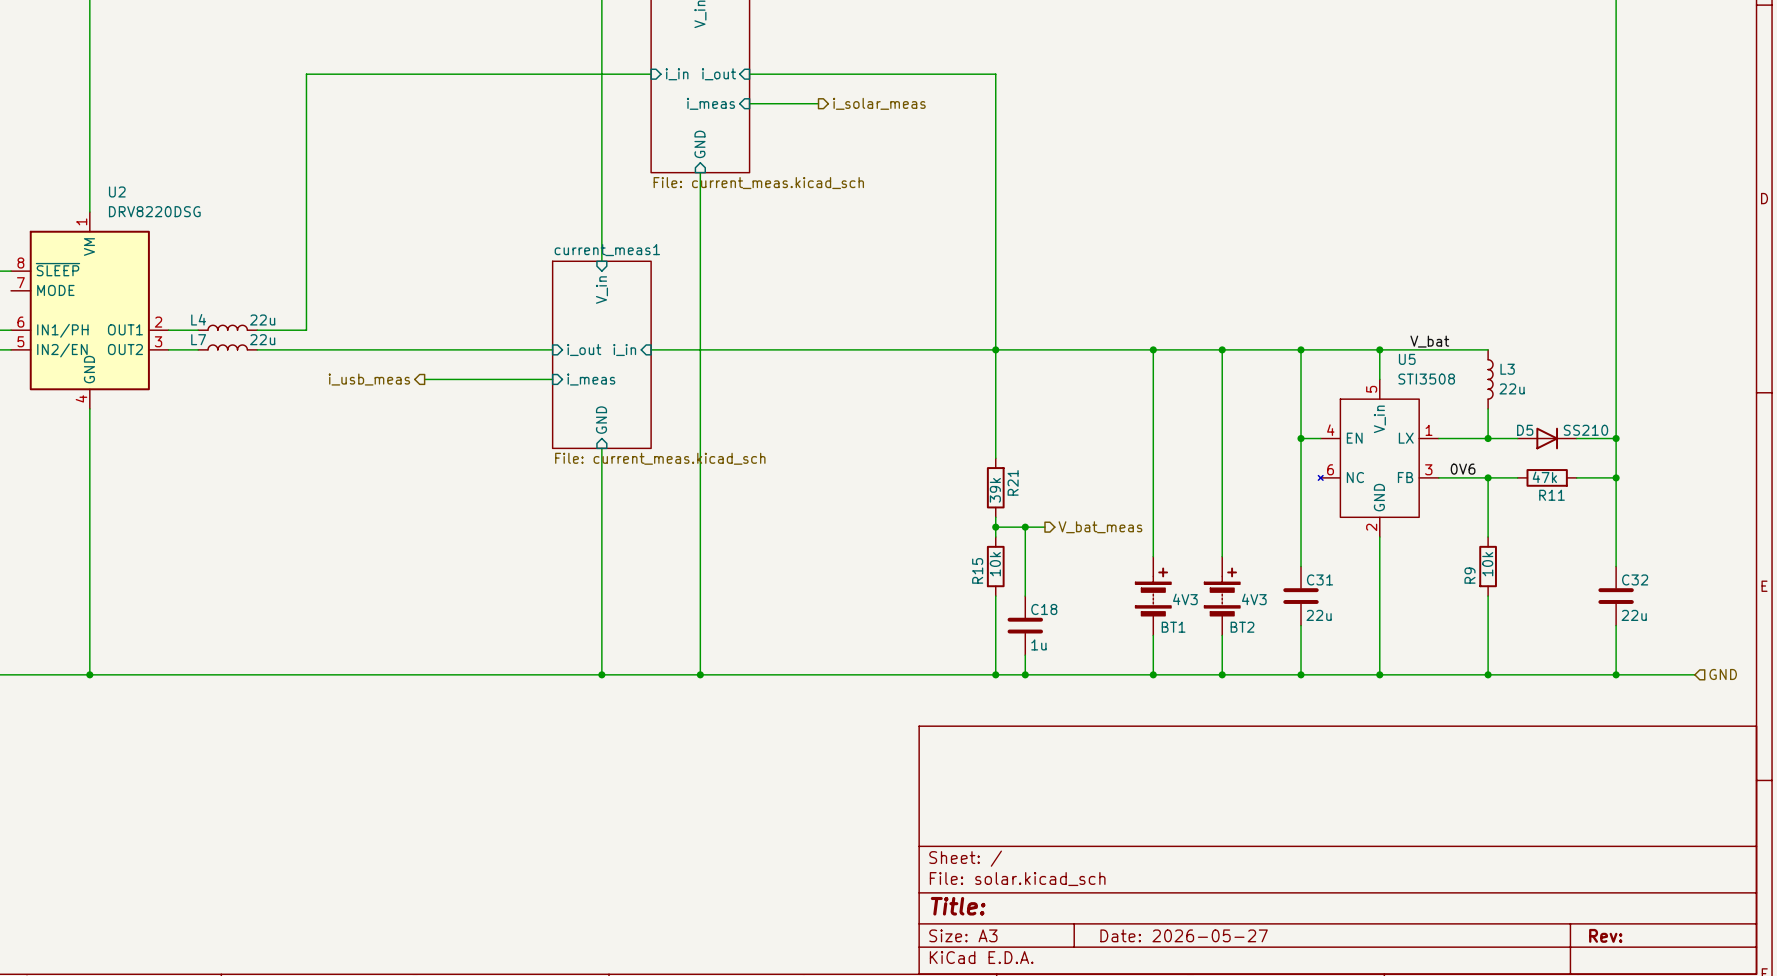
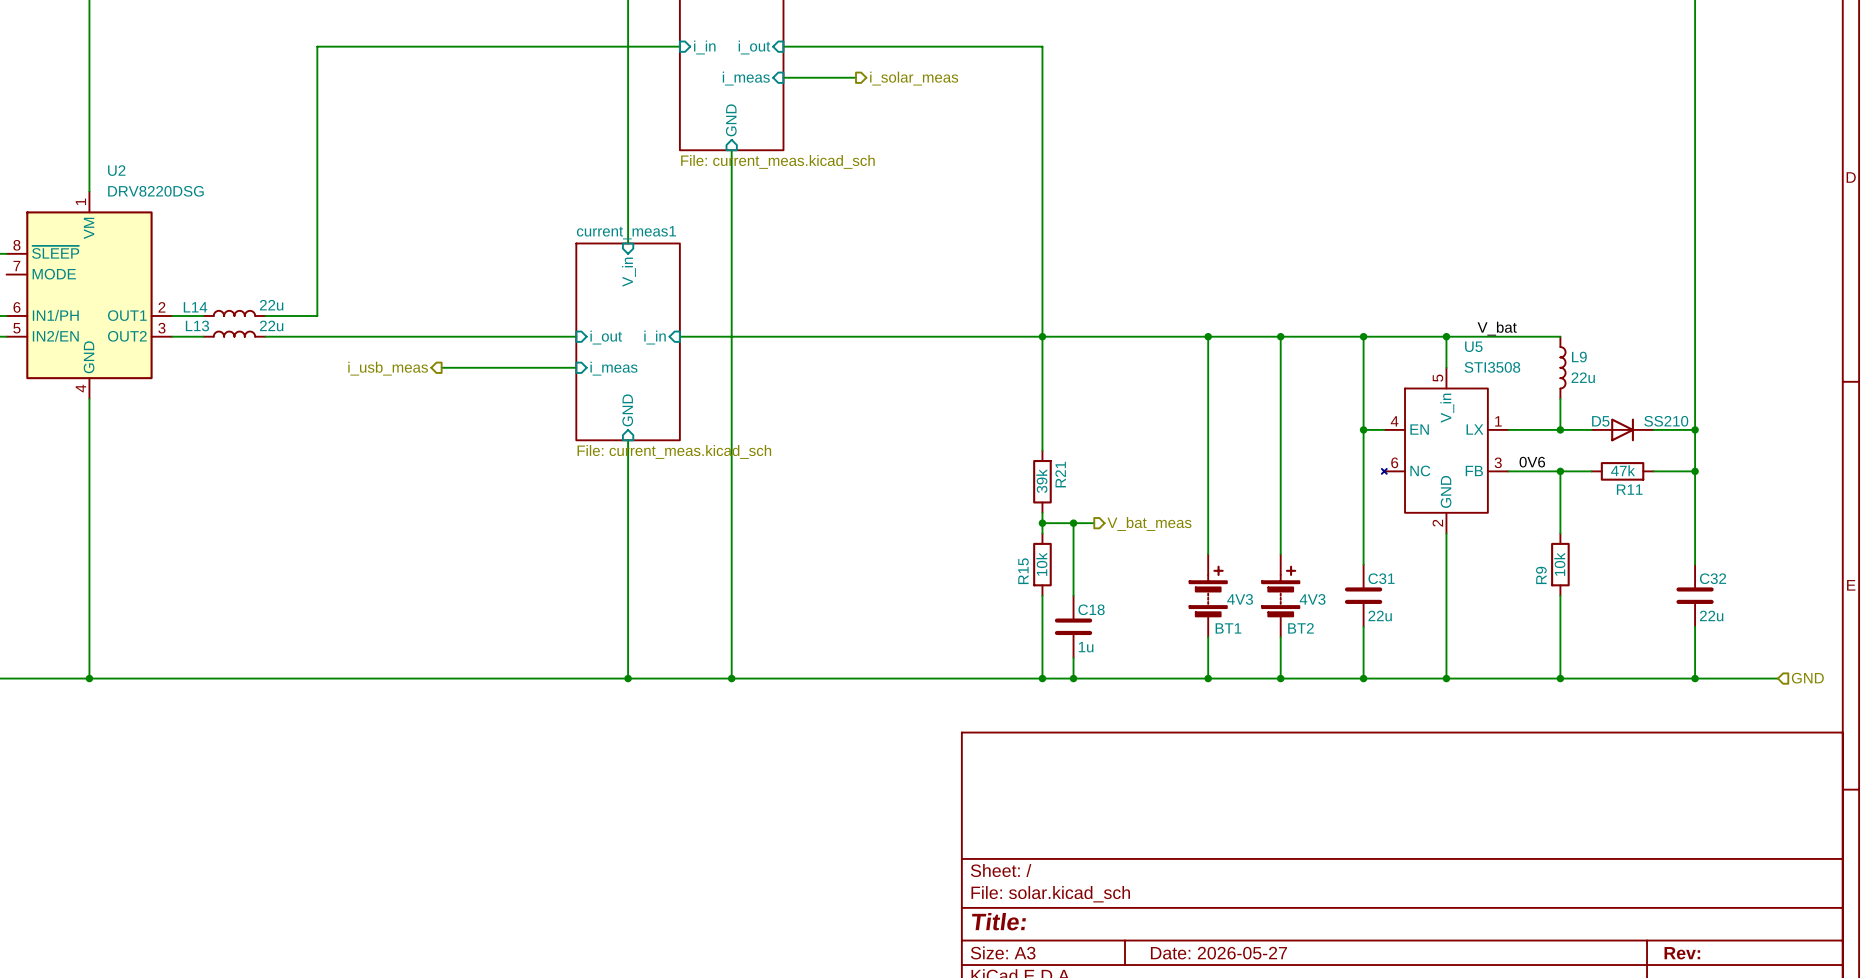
L4 name: L4 (198, 319) -> L14 (195, 307)
L7 name: L7 (198, 339) -> L13 (197, 325)
L3 name: L3 (1507, 369) -> L9 (1579, 357)

